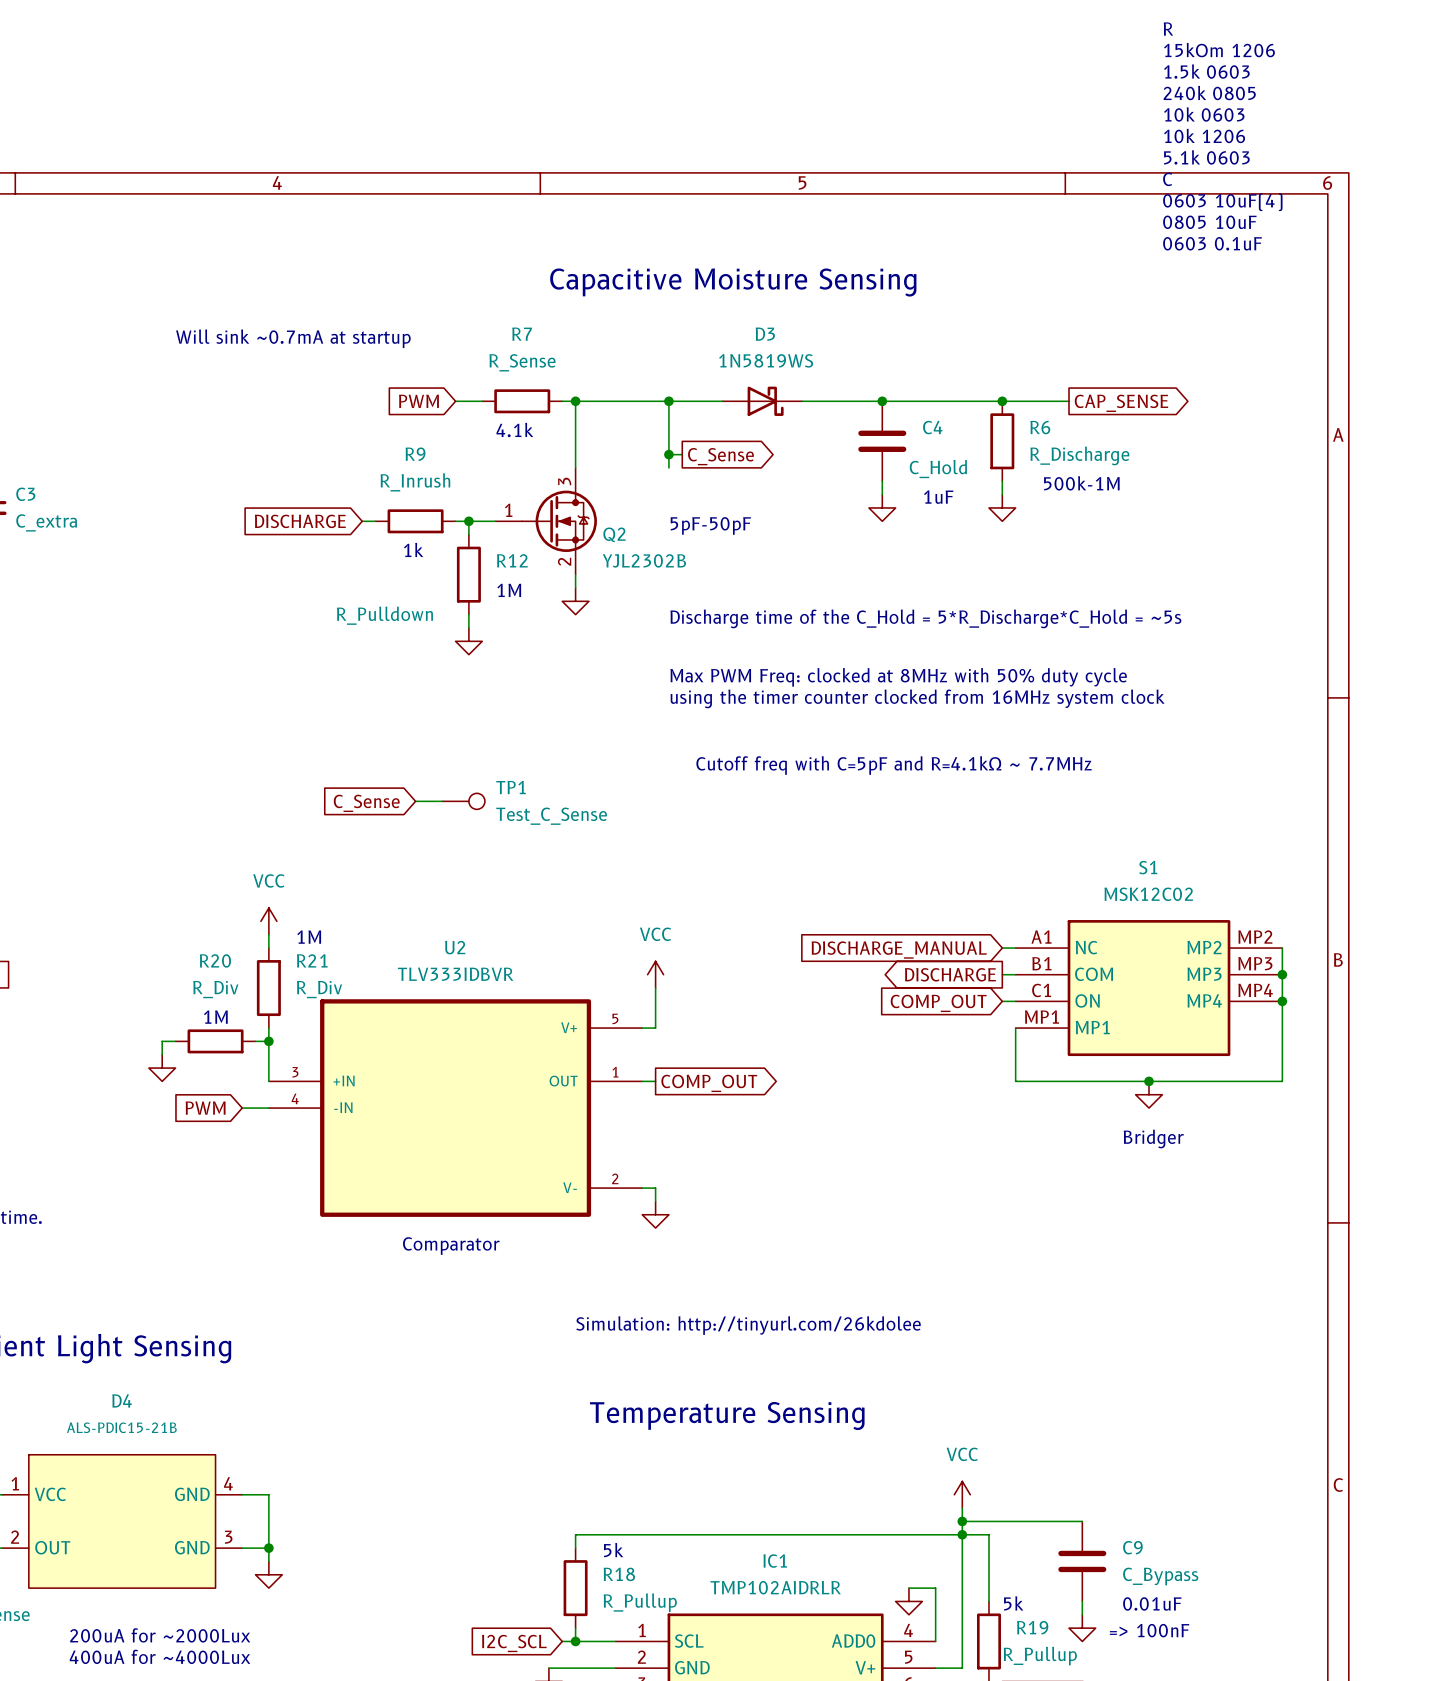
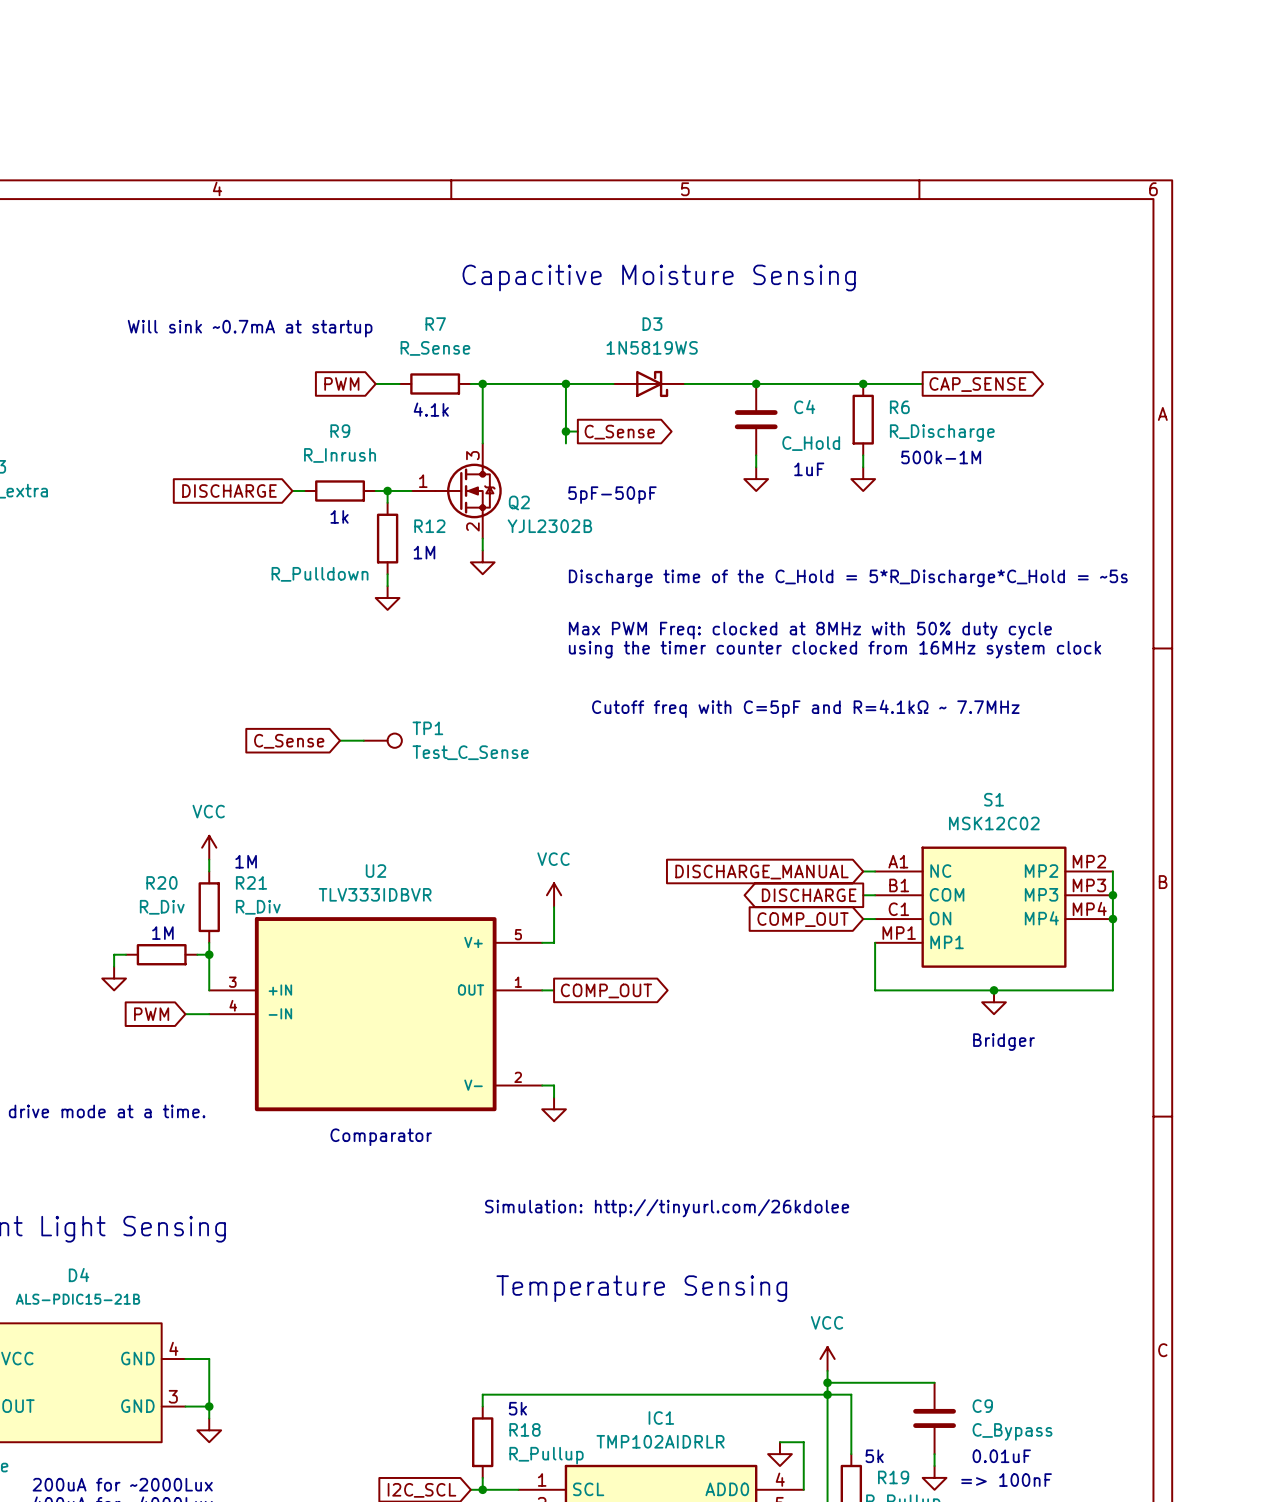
text: R (1168, 29) -> none
text: 15kOm 1206 (1219, 50) -> none
text: 1.5k 0603 (1206, 71) -> none
text: 240k 0805 (1209, 93) -> none
text: 10k 0603 (1204, 114) -> none
text: 10k 1206 (1204, 135) -> none
text: 5.1k 0603 (1206, 157) -> none
text: C (1167, 179) -> none
text: 0603 10uF(4) (1222, 202) -> none
text: 0805 10uF (1209, 222) -> none
text: 0603 0.1uF (1212, 243) -> none

